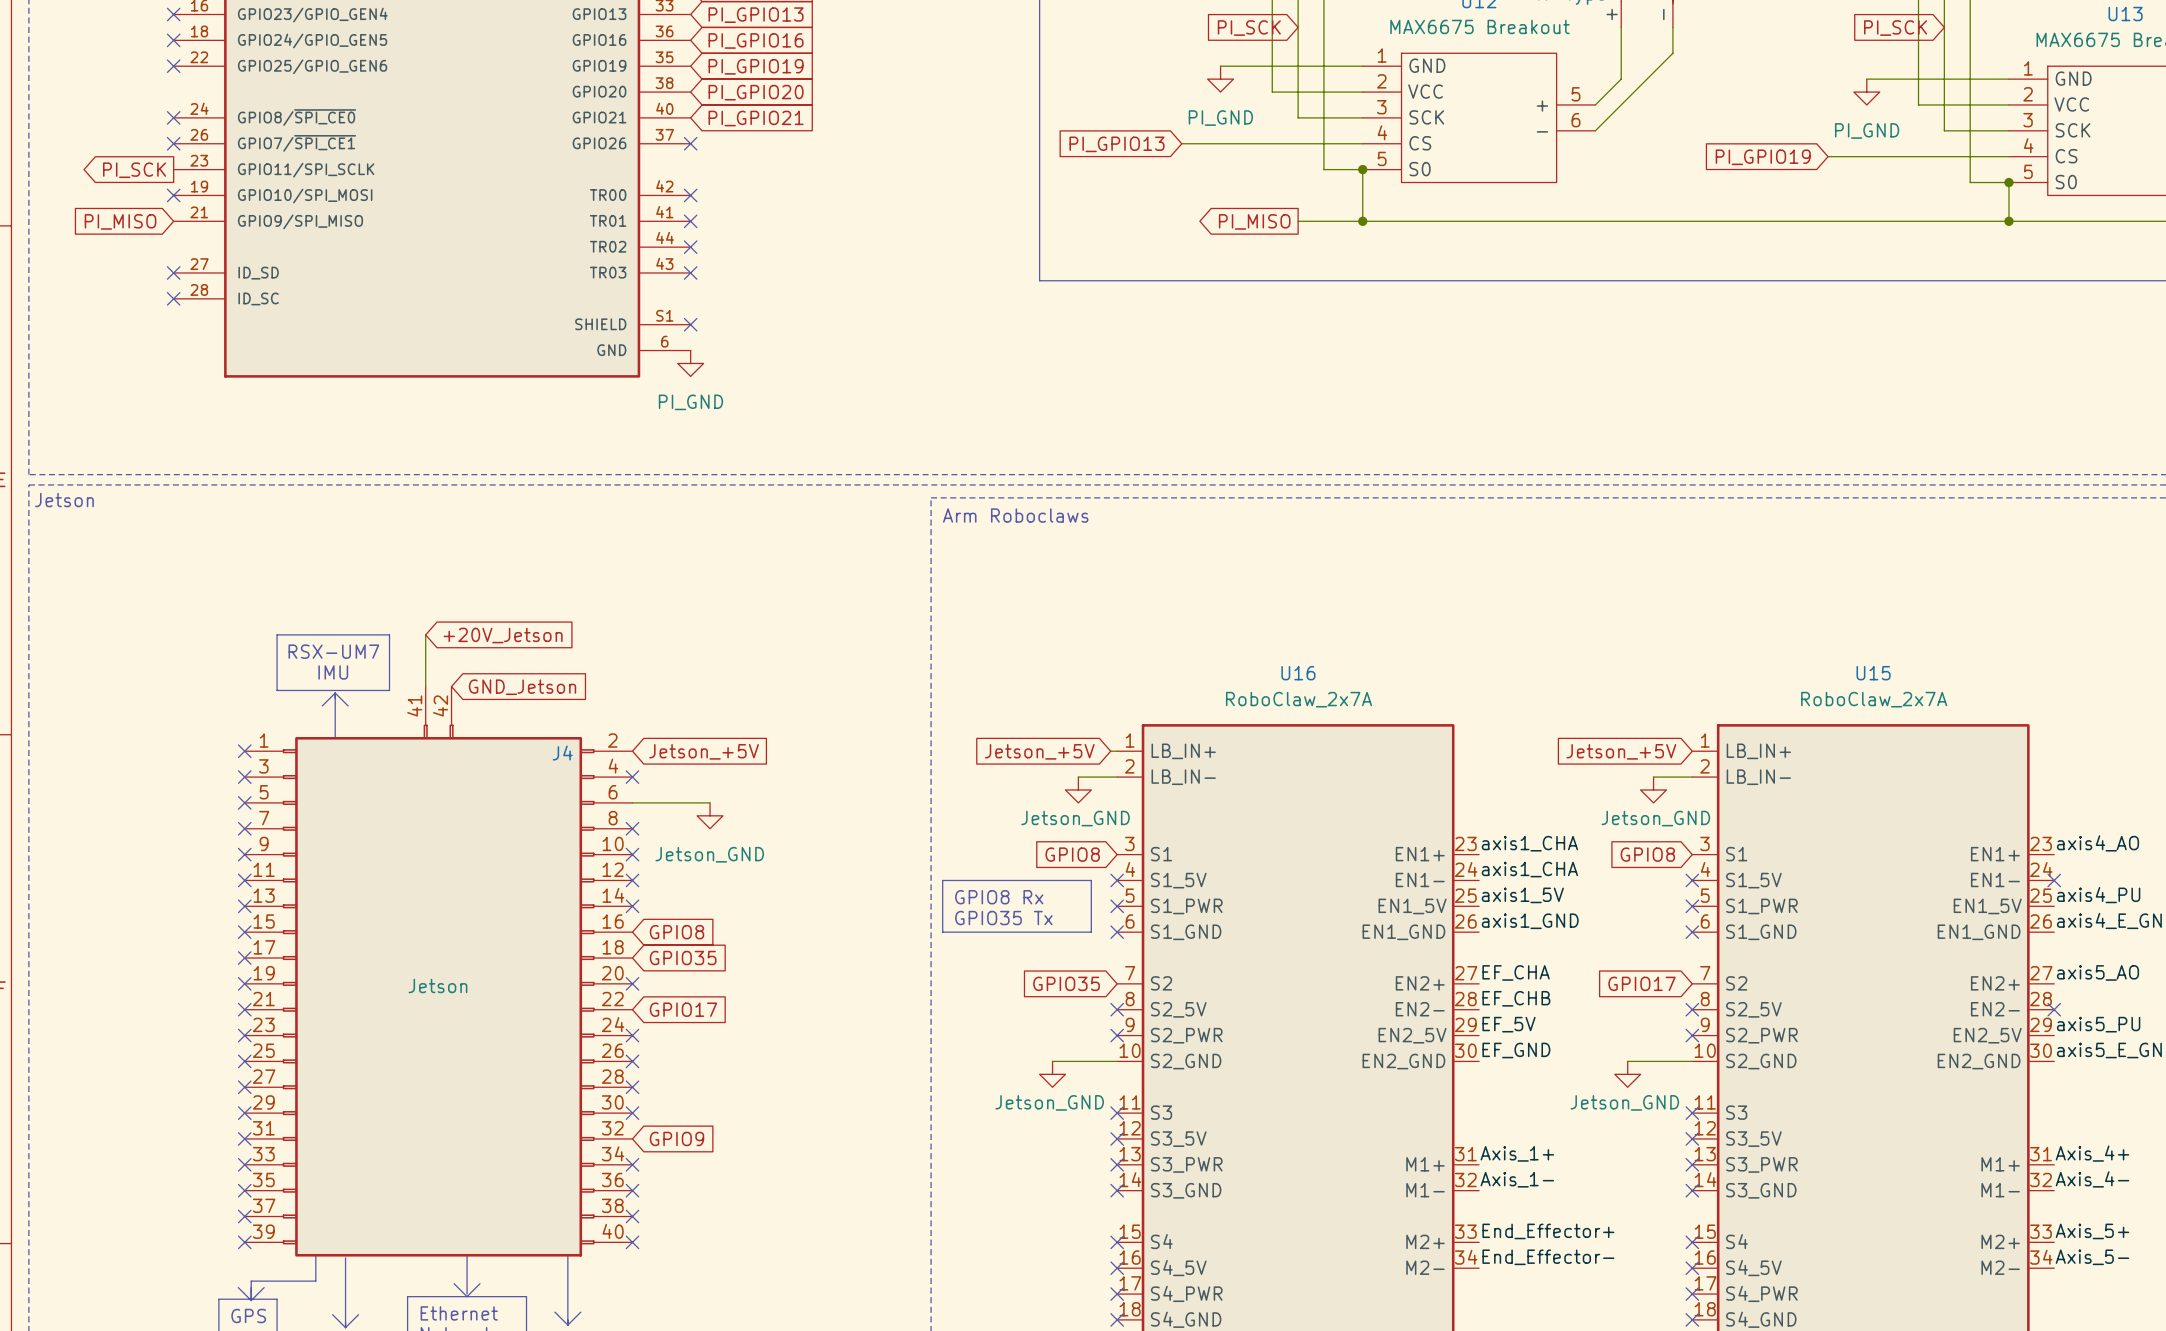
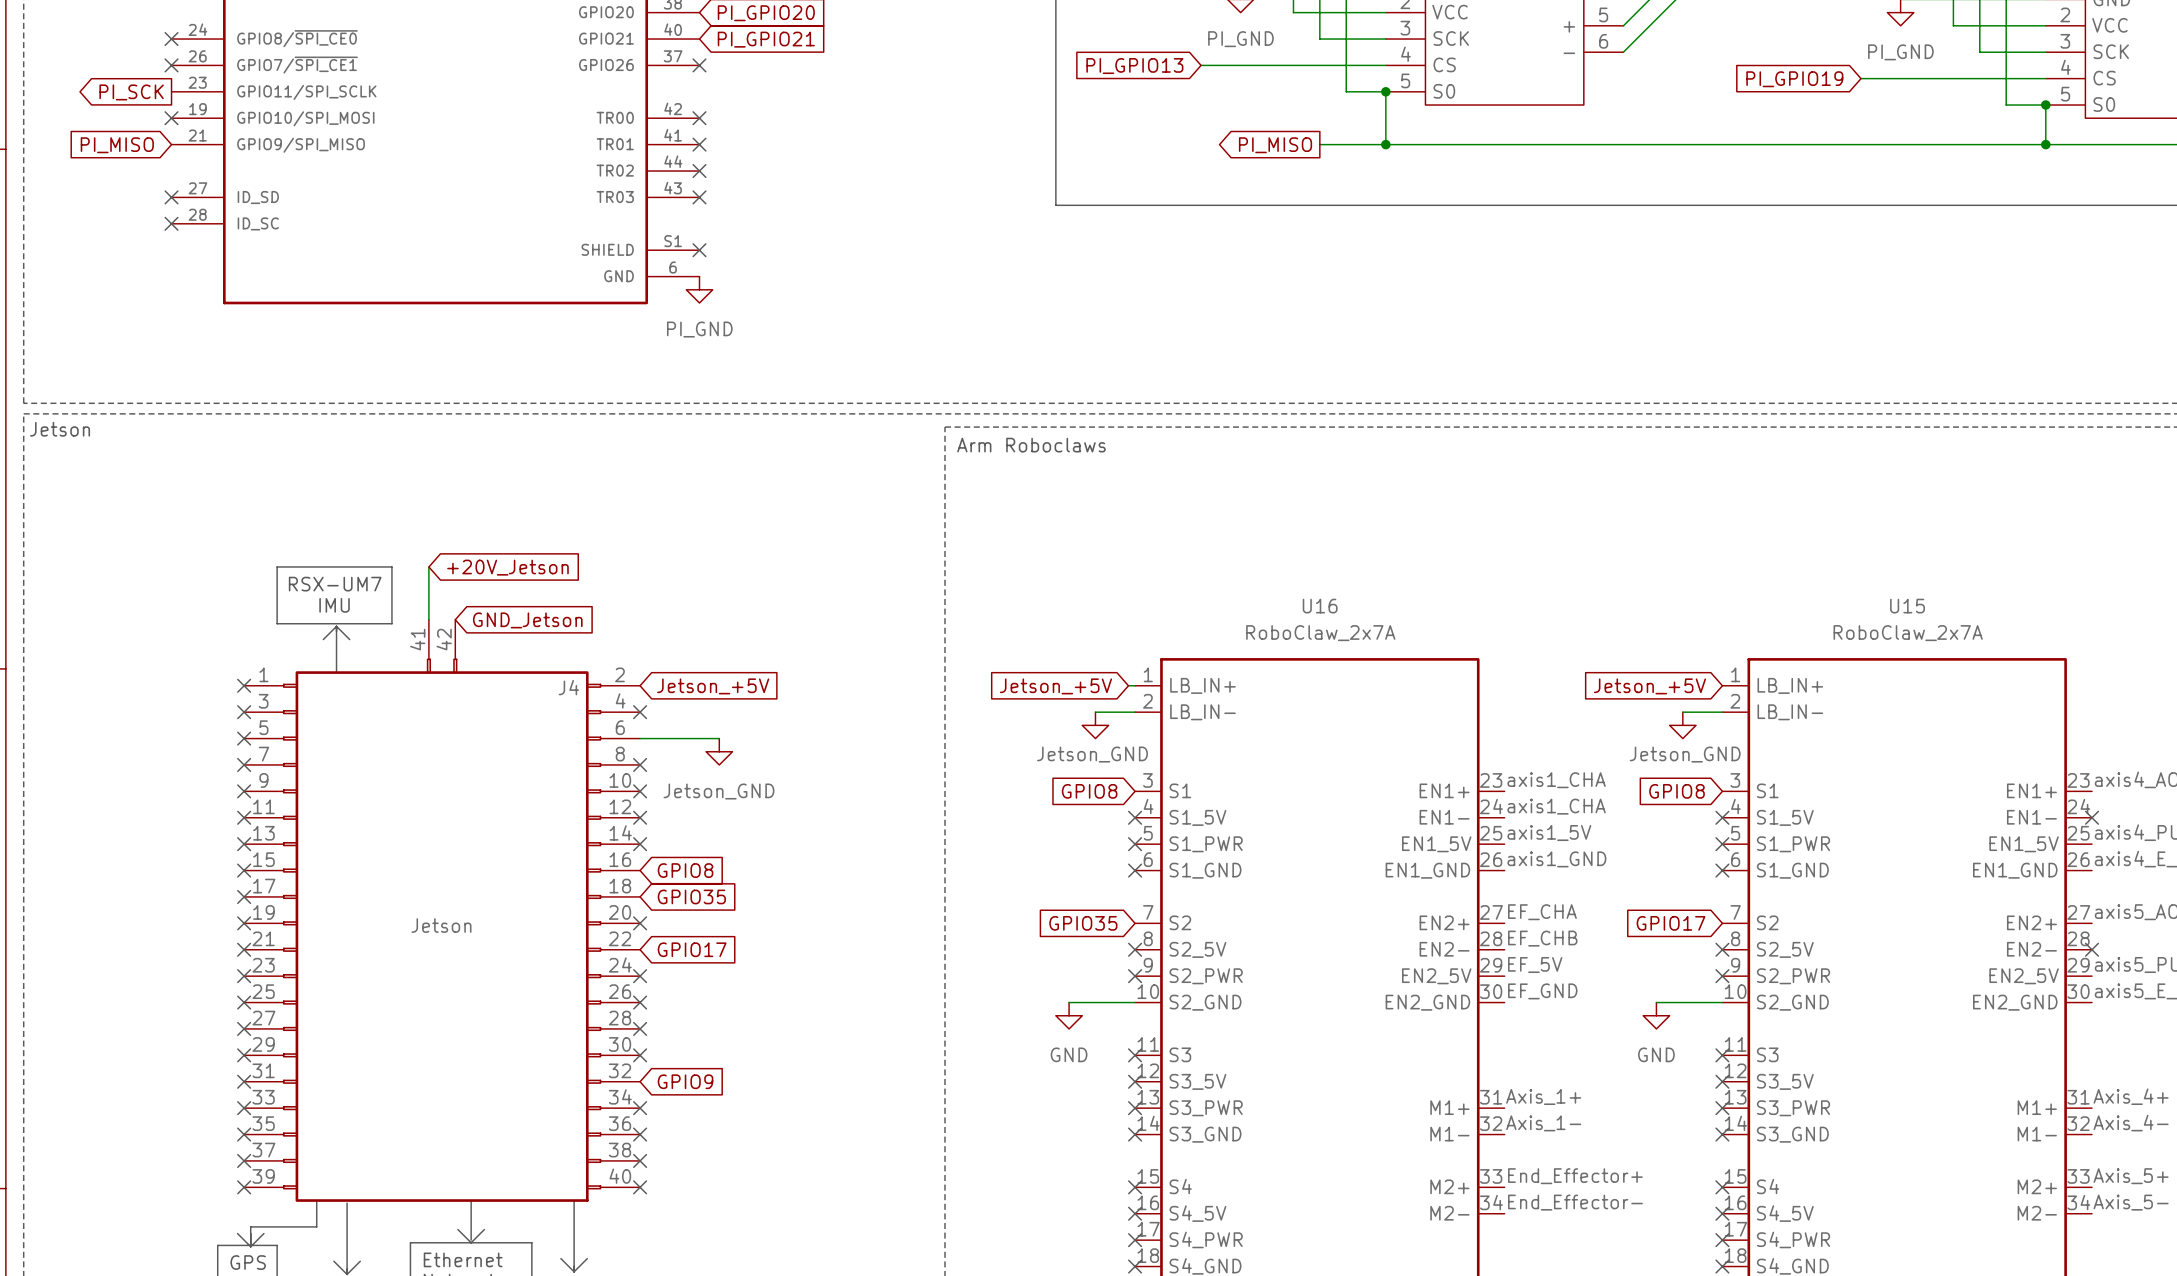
line: (942, 880) (1091, 880) (1091, 932) (942, 932) (942, 880) -> none
text: GPIO8 Rx (999, 897) -> none
text: GPIO35 Tx (1003, 918) -> none
power symbol: Jetson_GND (1052, 1074) -> GND (1069, 1015)
power symbol: Jetson_GND (1627, 1074) -> GND (1656, 1015)

